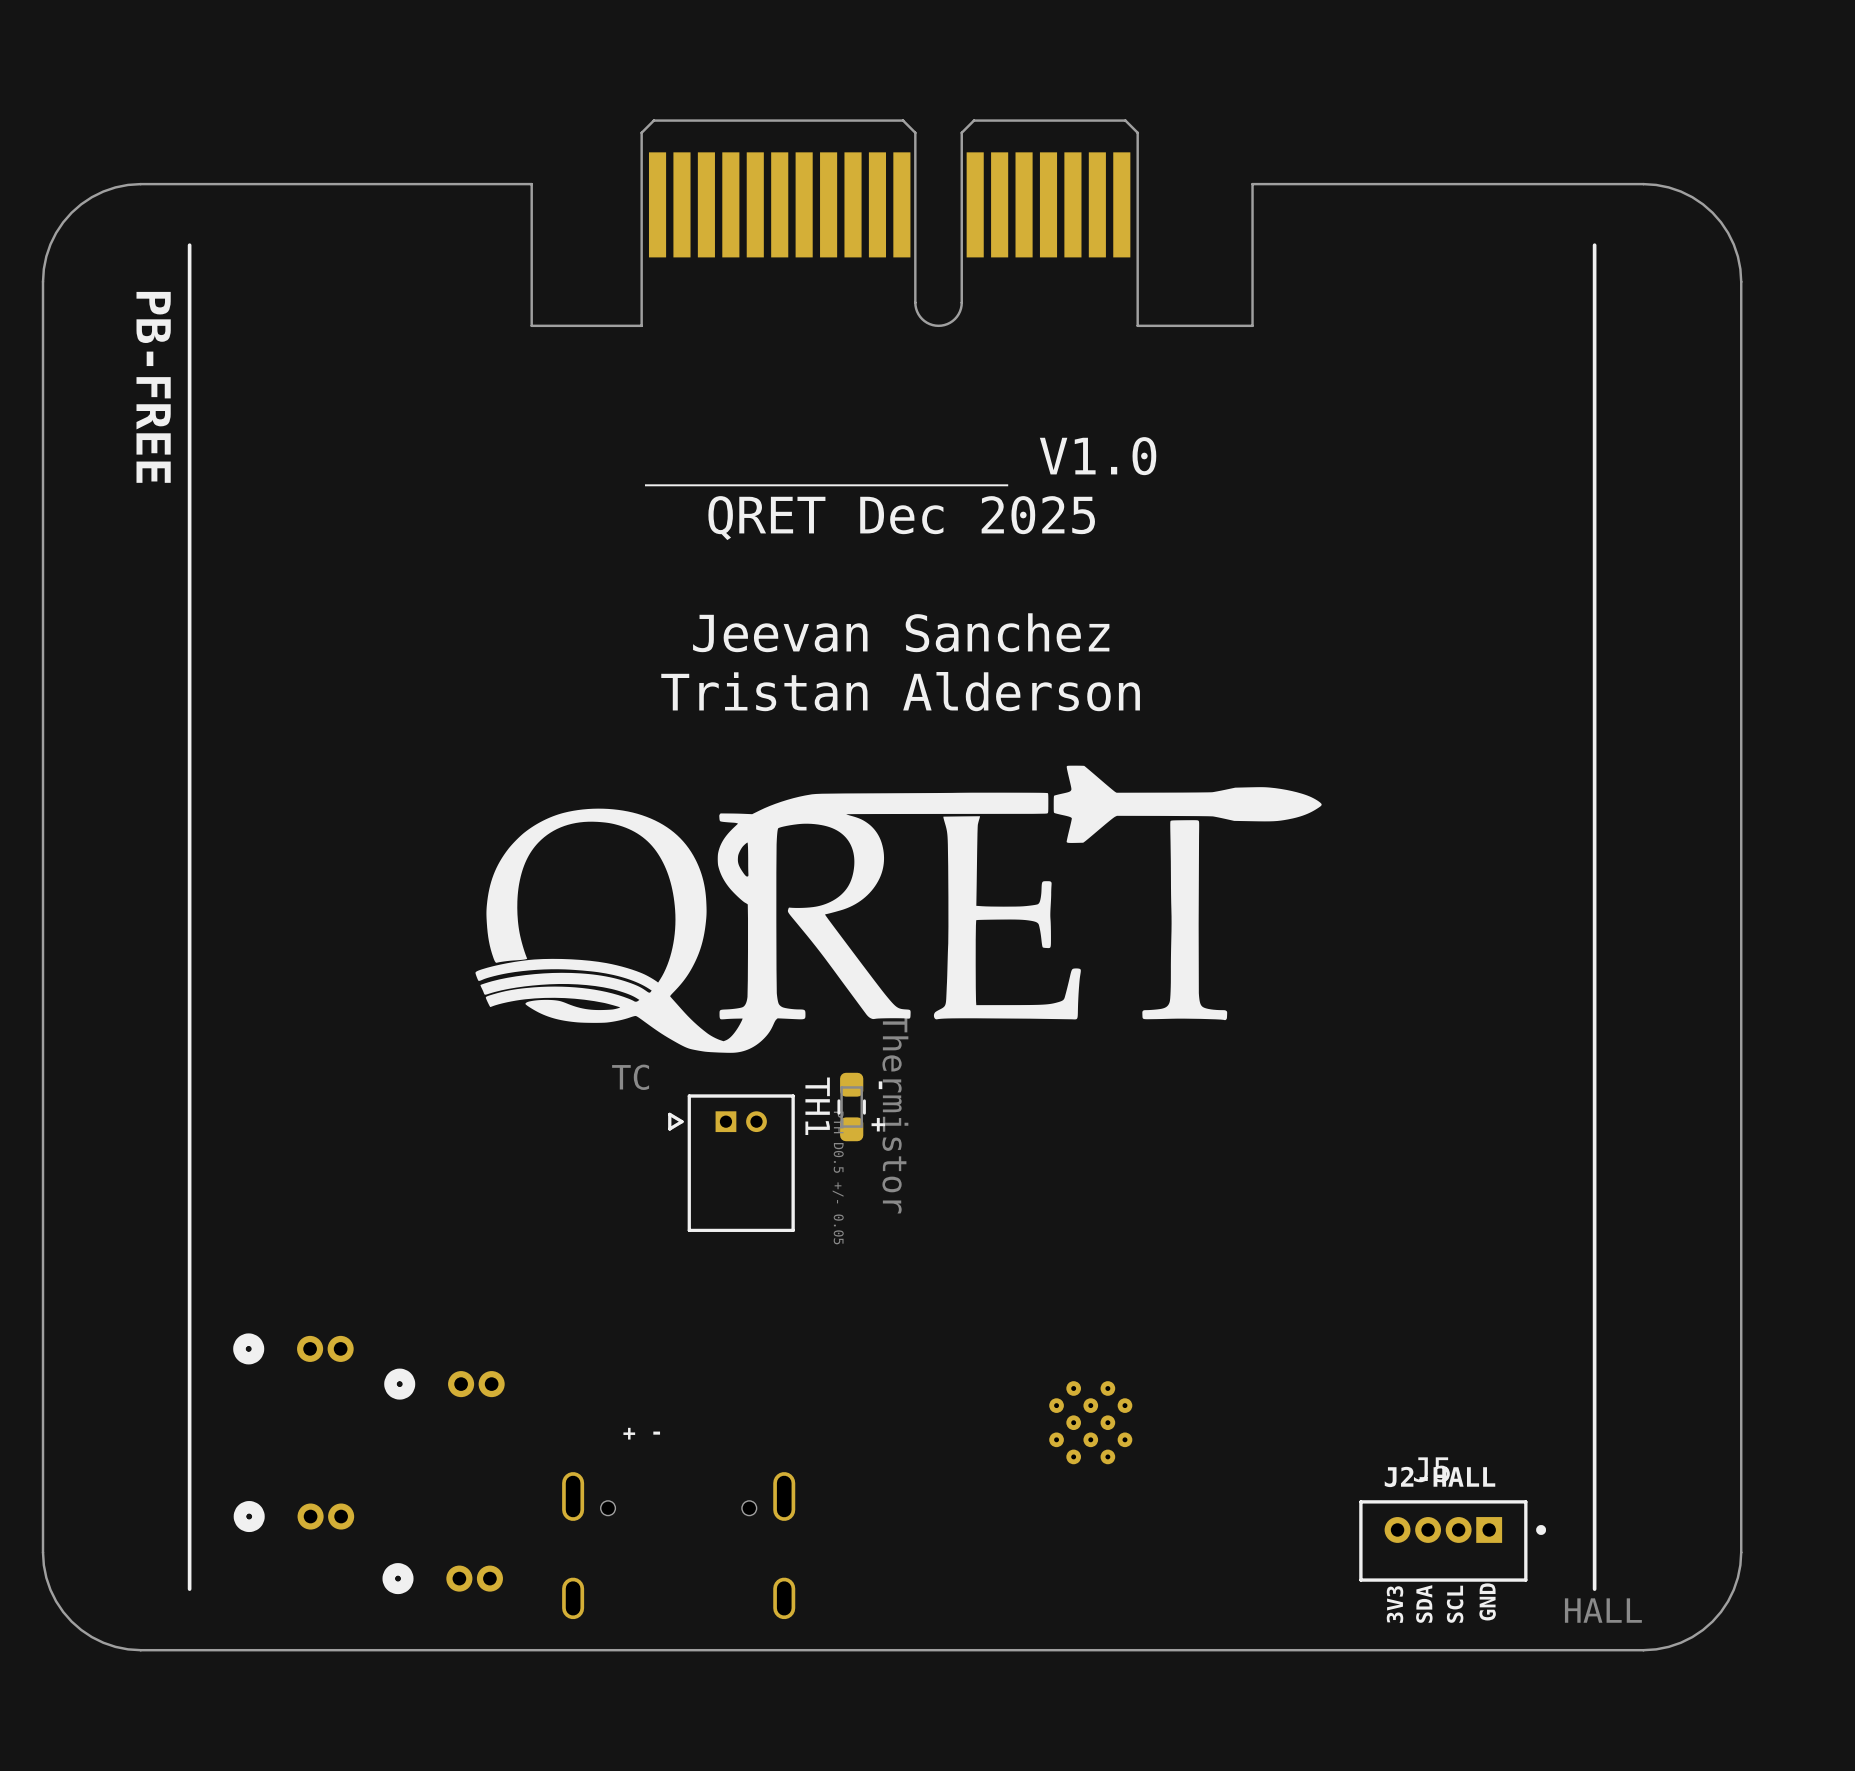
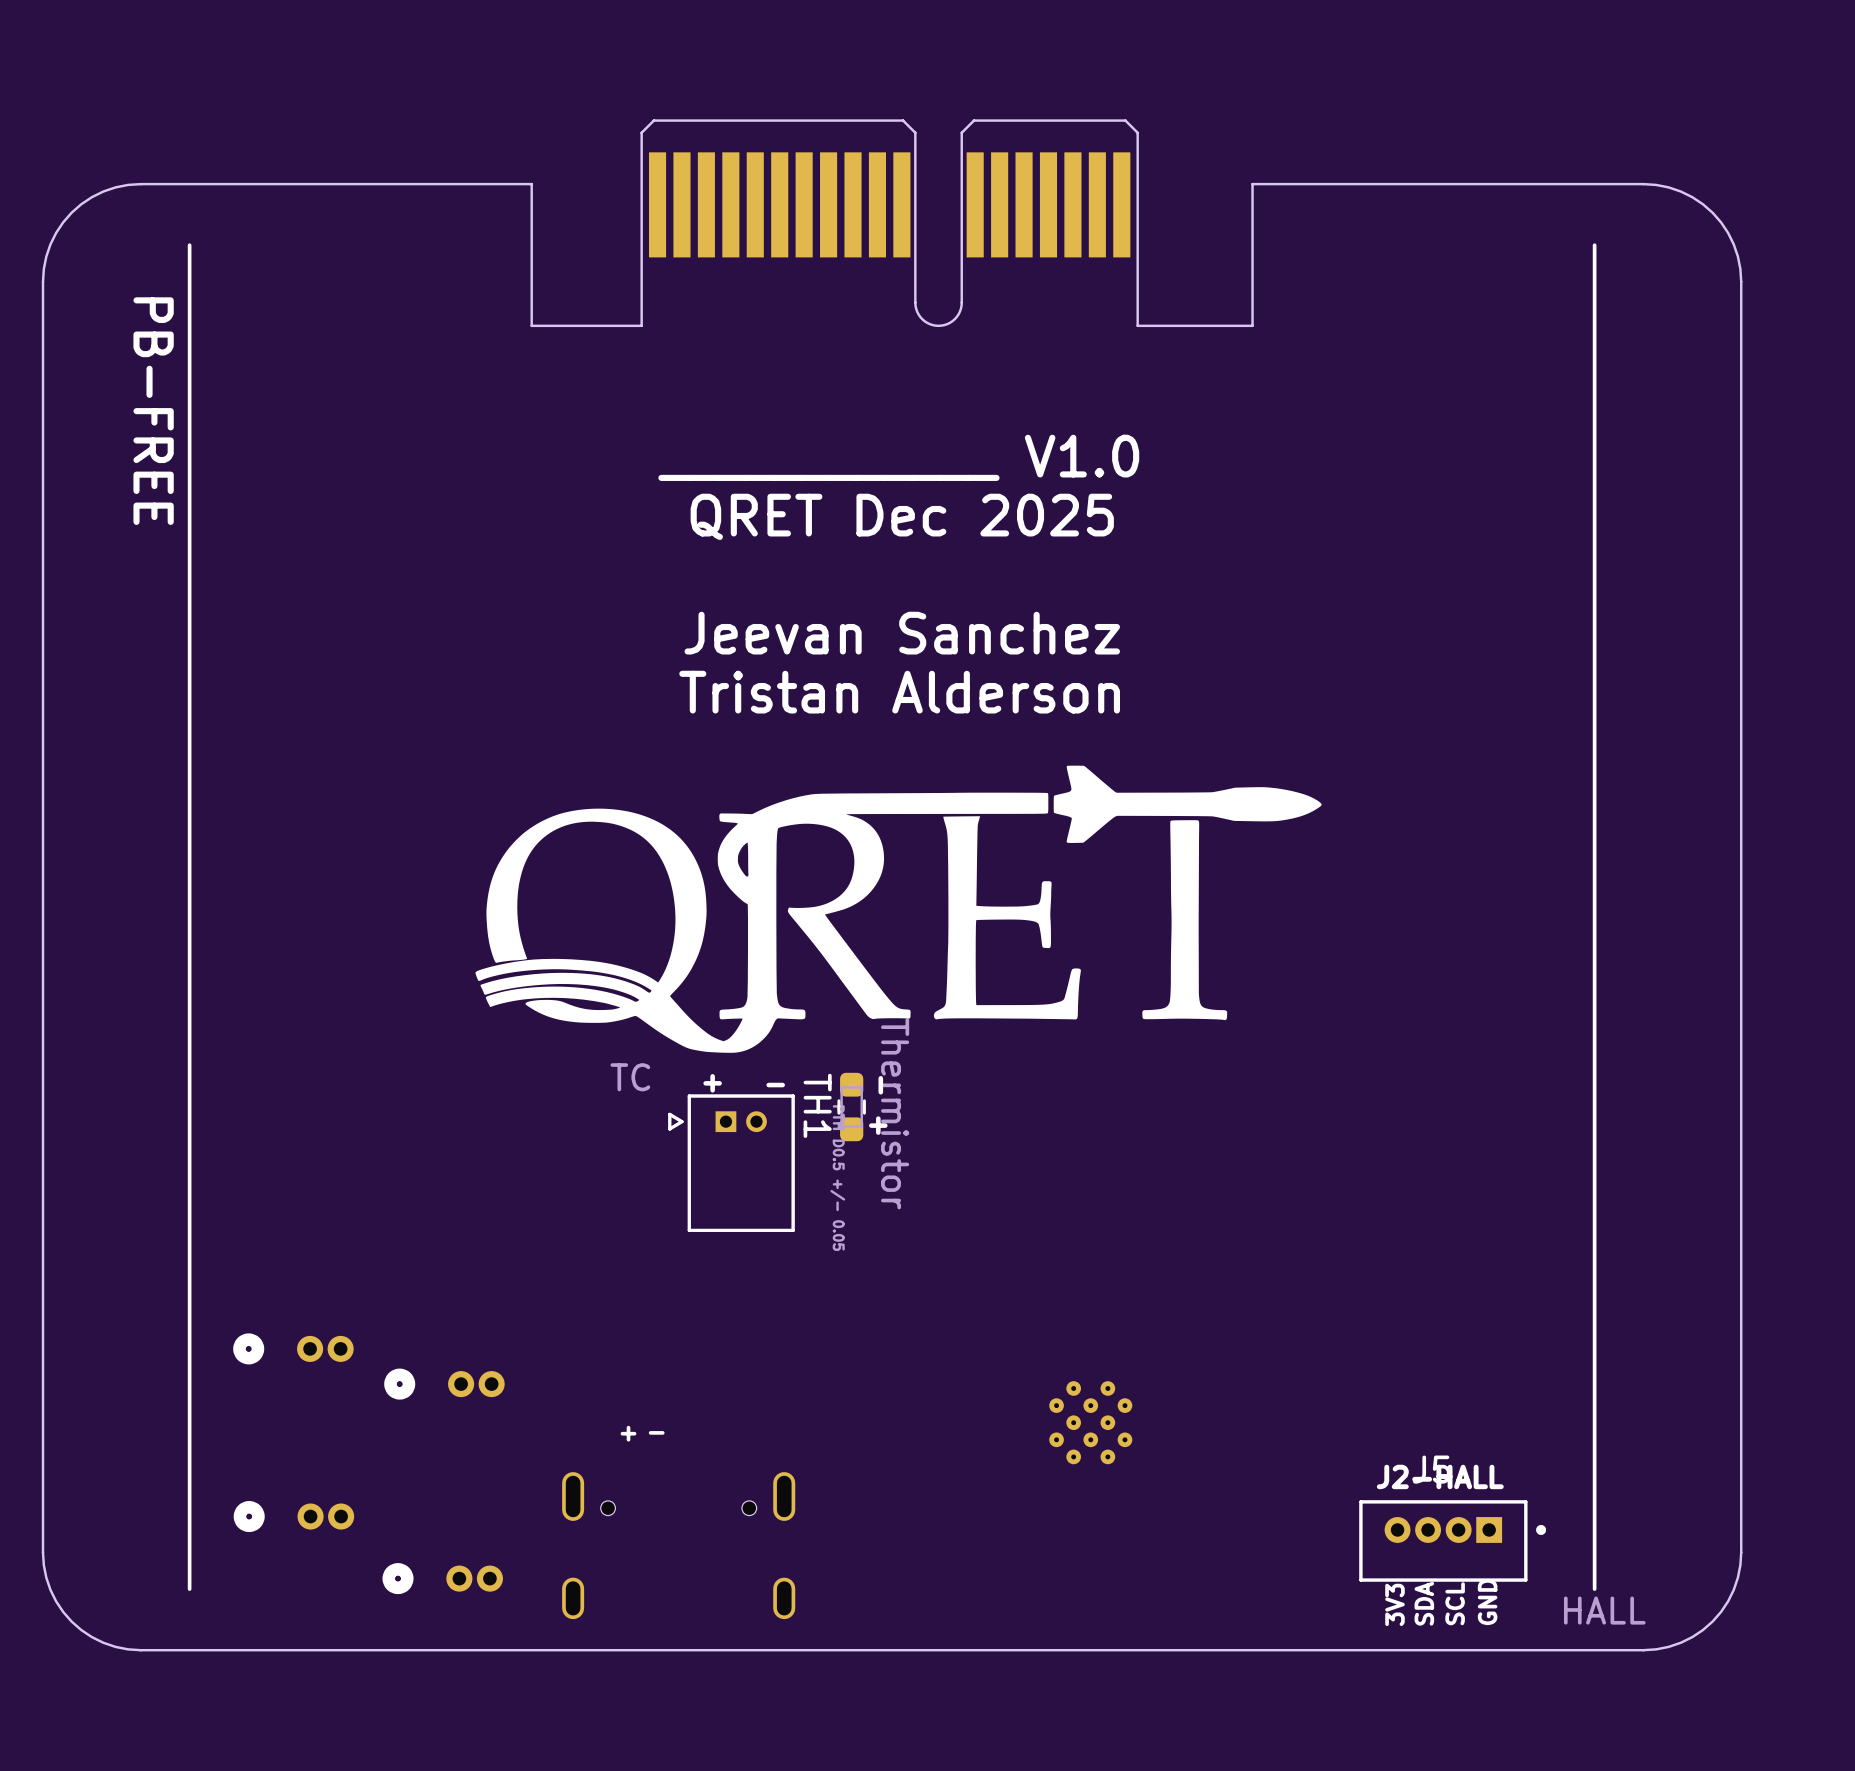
text: none -> + (712, 1083)
text: none -> - (775, 1085)

